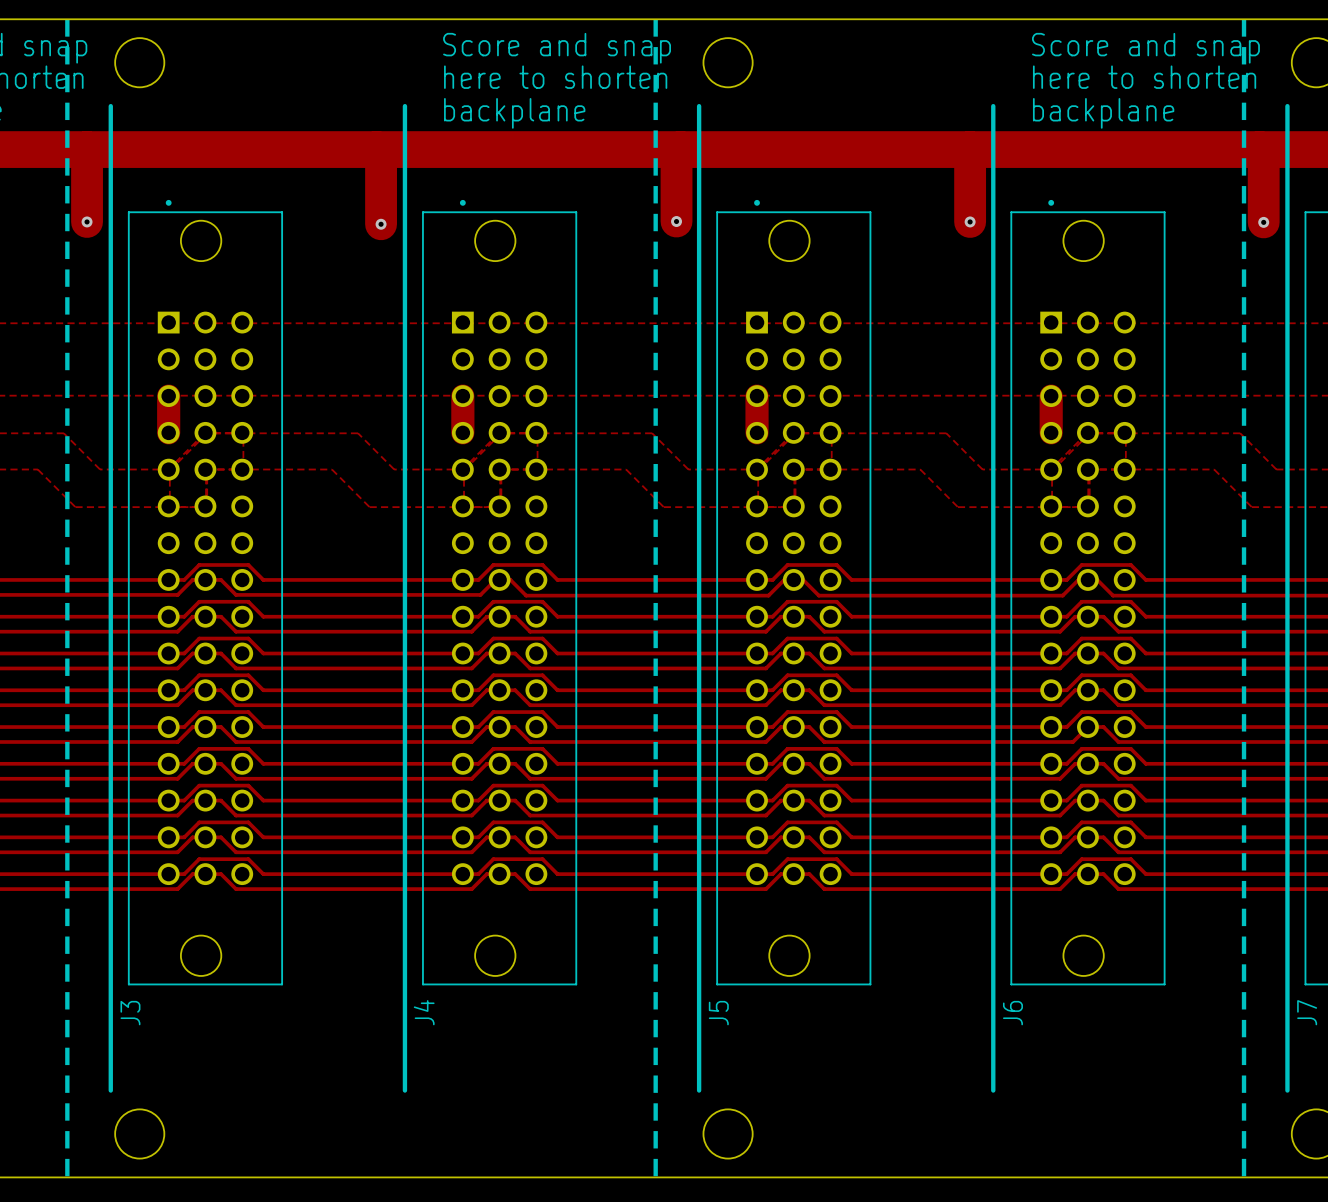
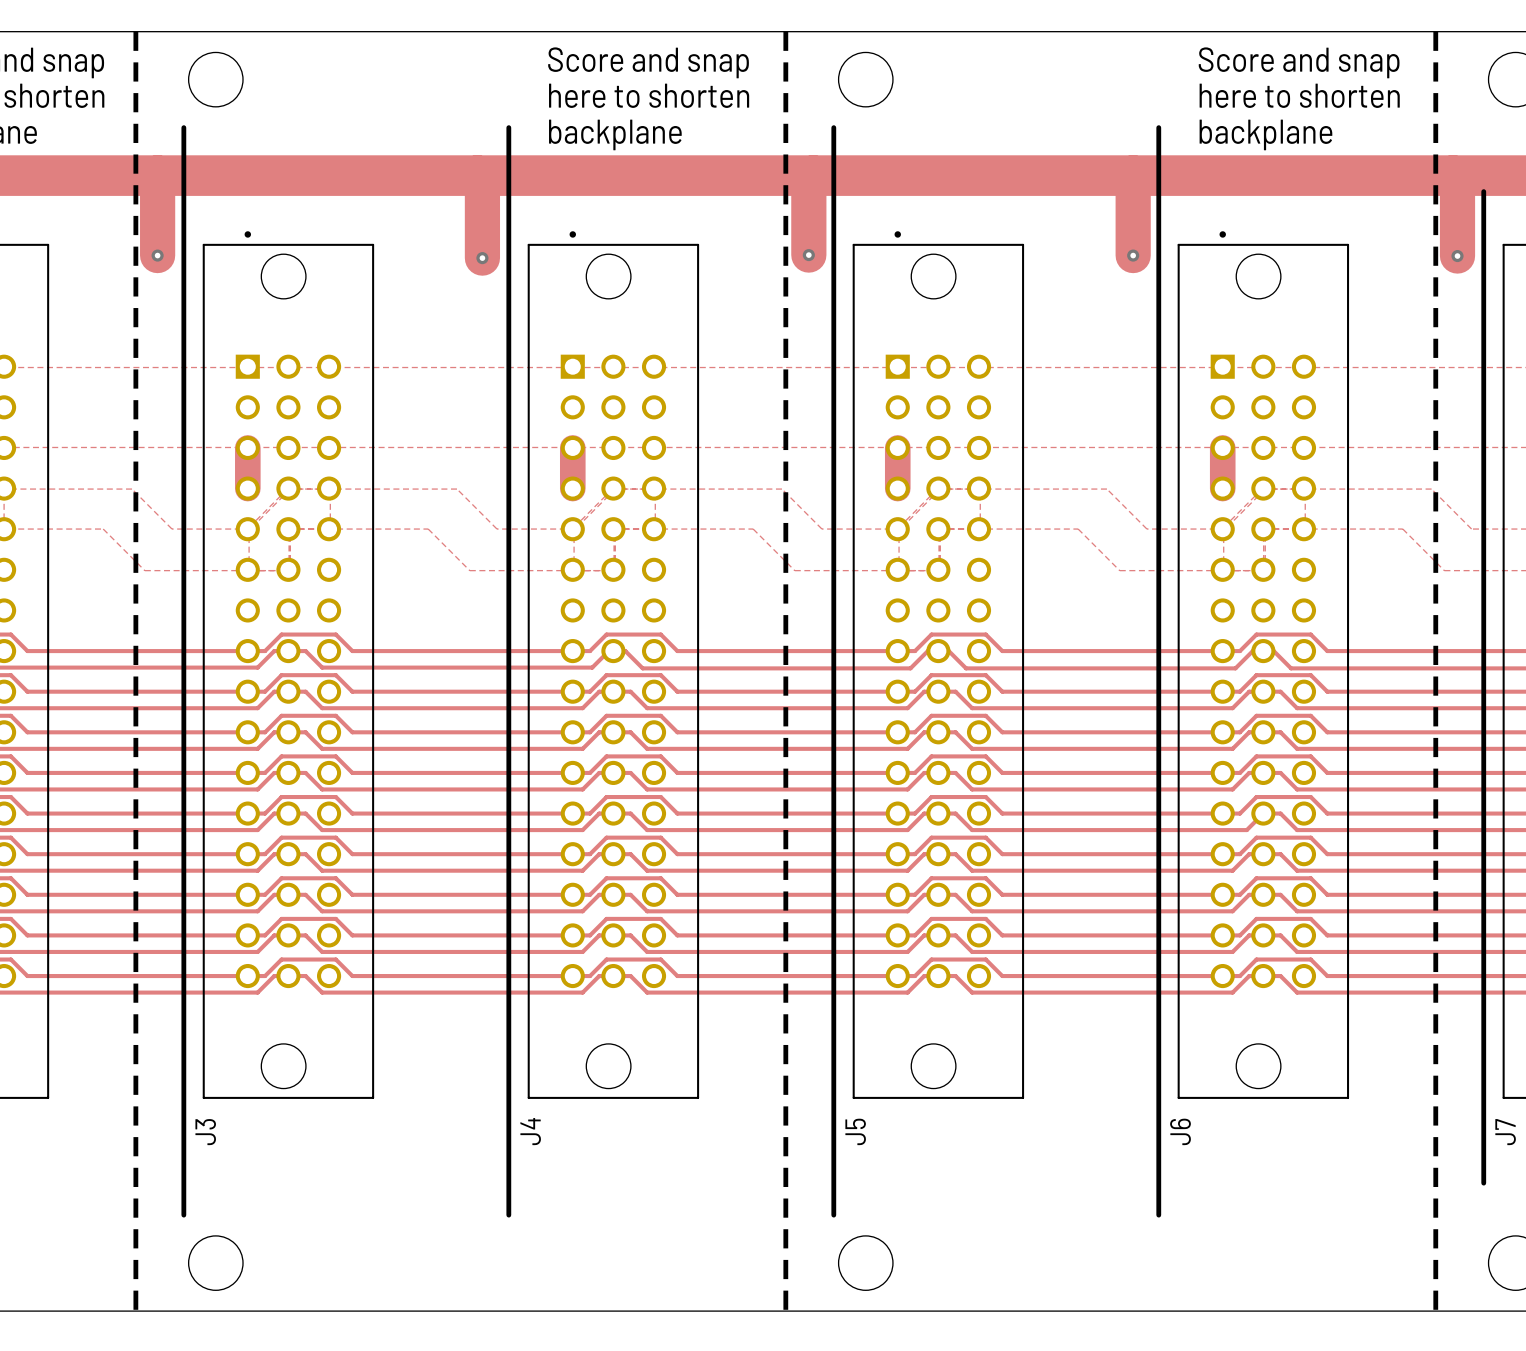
line: (1287, 106) (1287, 164) -> none
line: (1287, 1061) (1287, 1090) -> none

